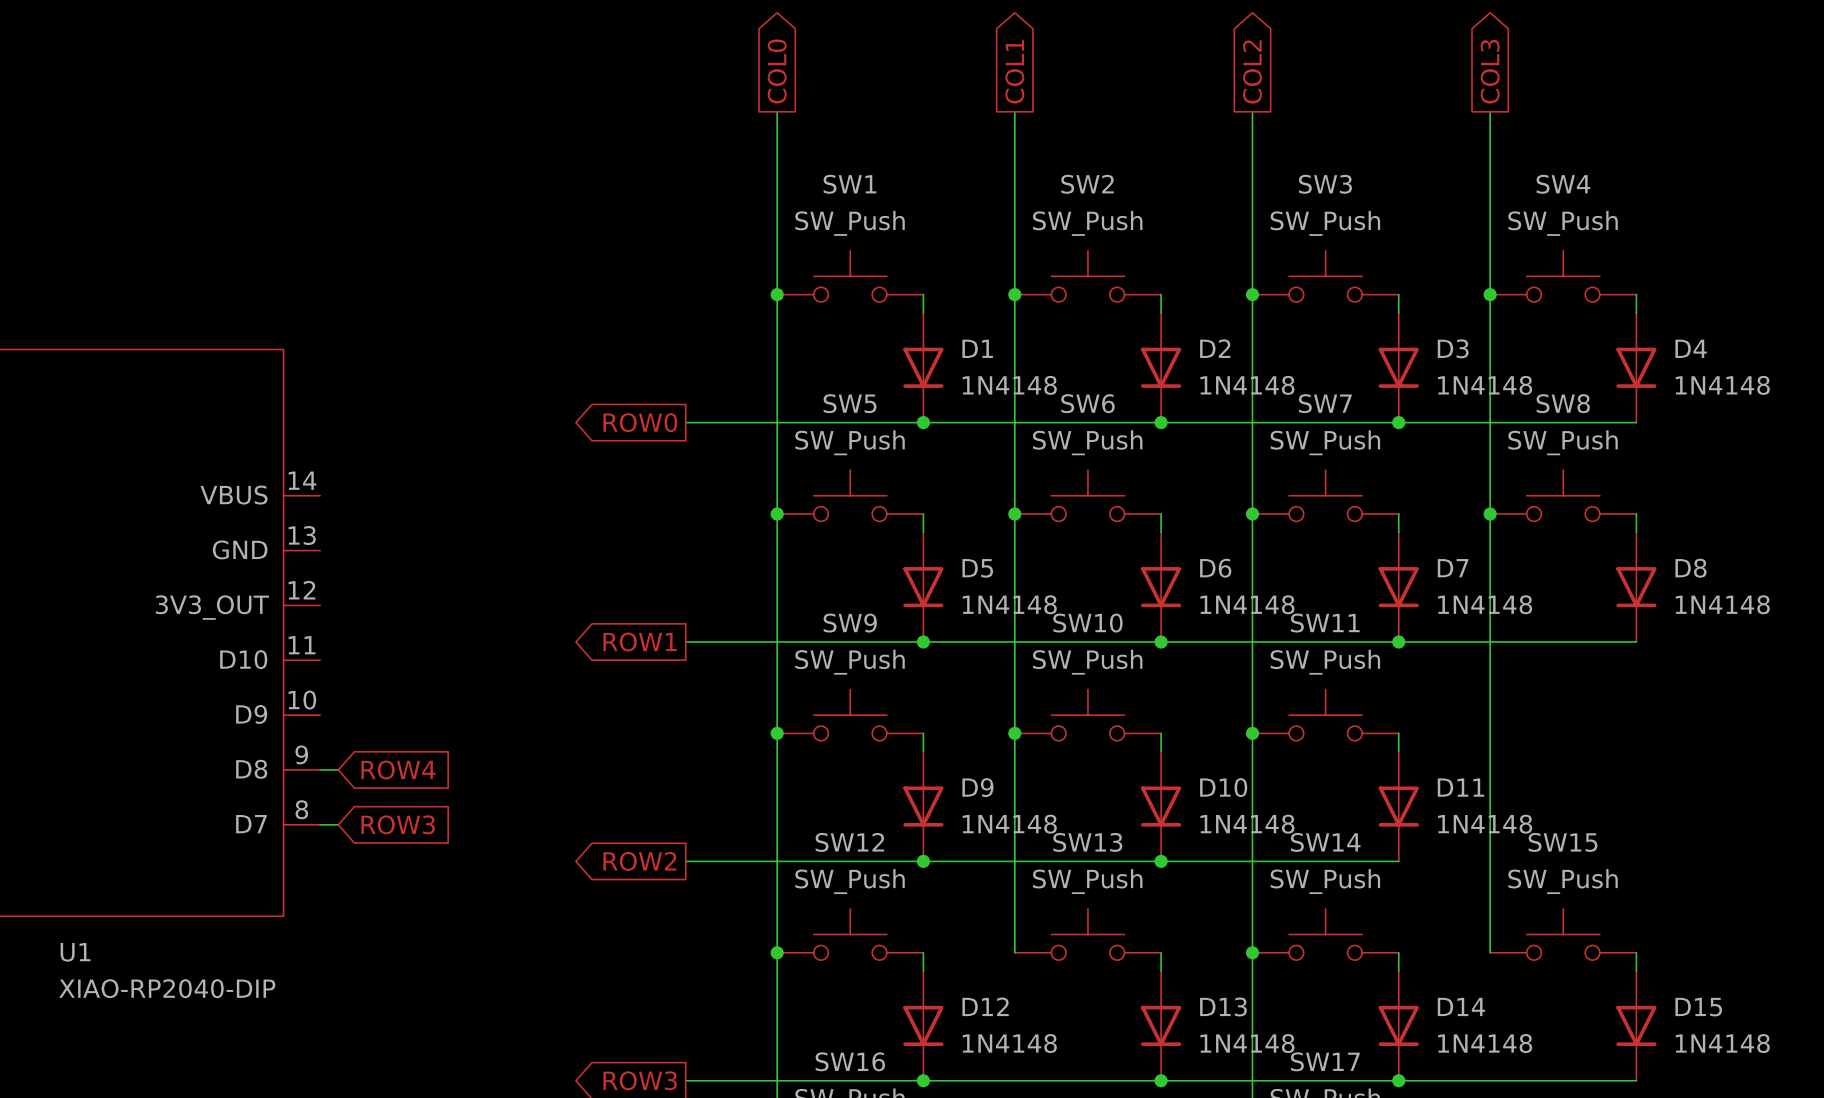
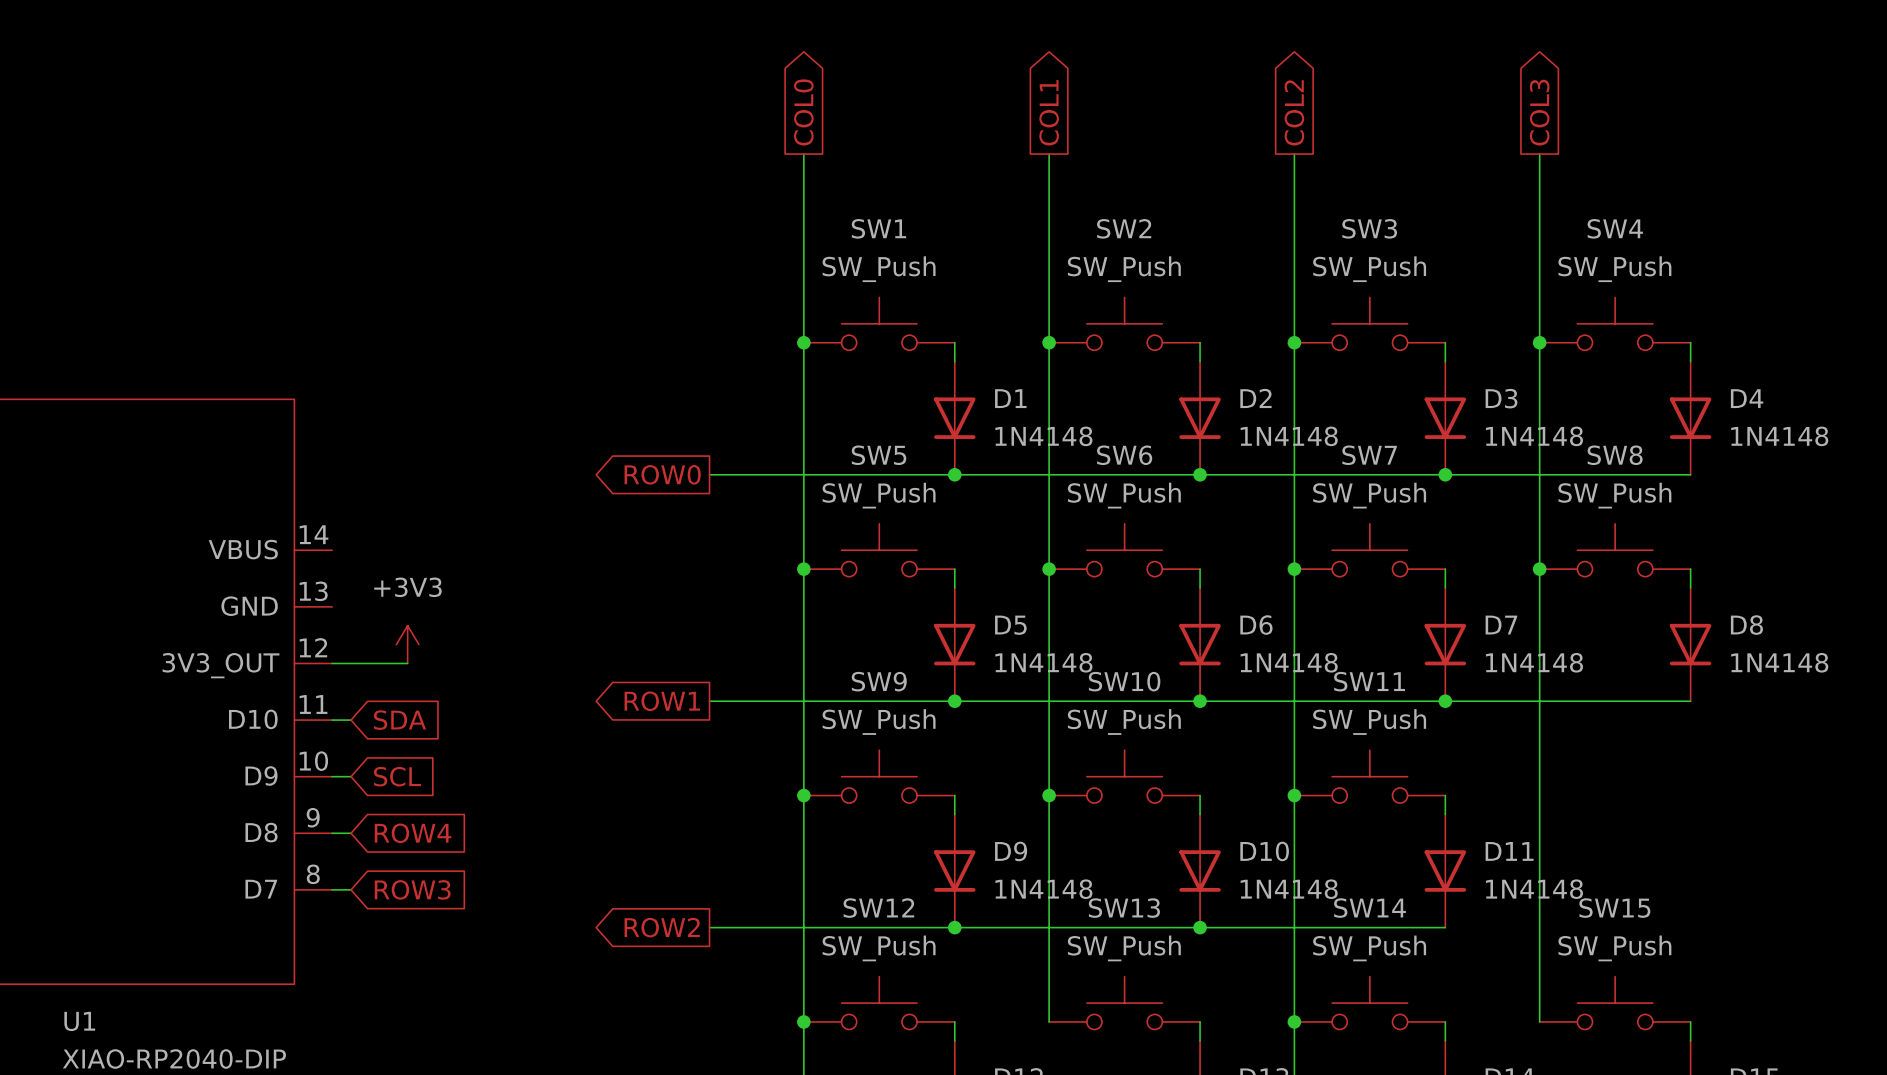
power symbol: none -> +3V3 (407, 644)
wire: none -> (332, 663) (407, 663)
wire: none -> (332, 720) (351, 720)
global label: none -> SDA (400, 720)
wire: none -> (332, 776) (351, 776)
global label: none -> SCL (397, 776)

